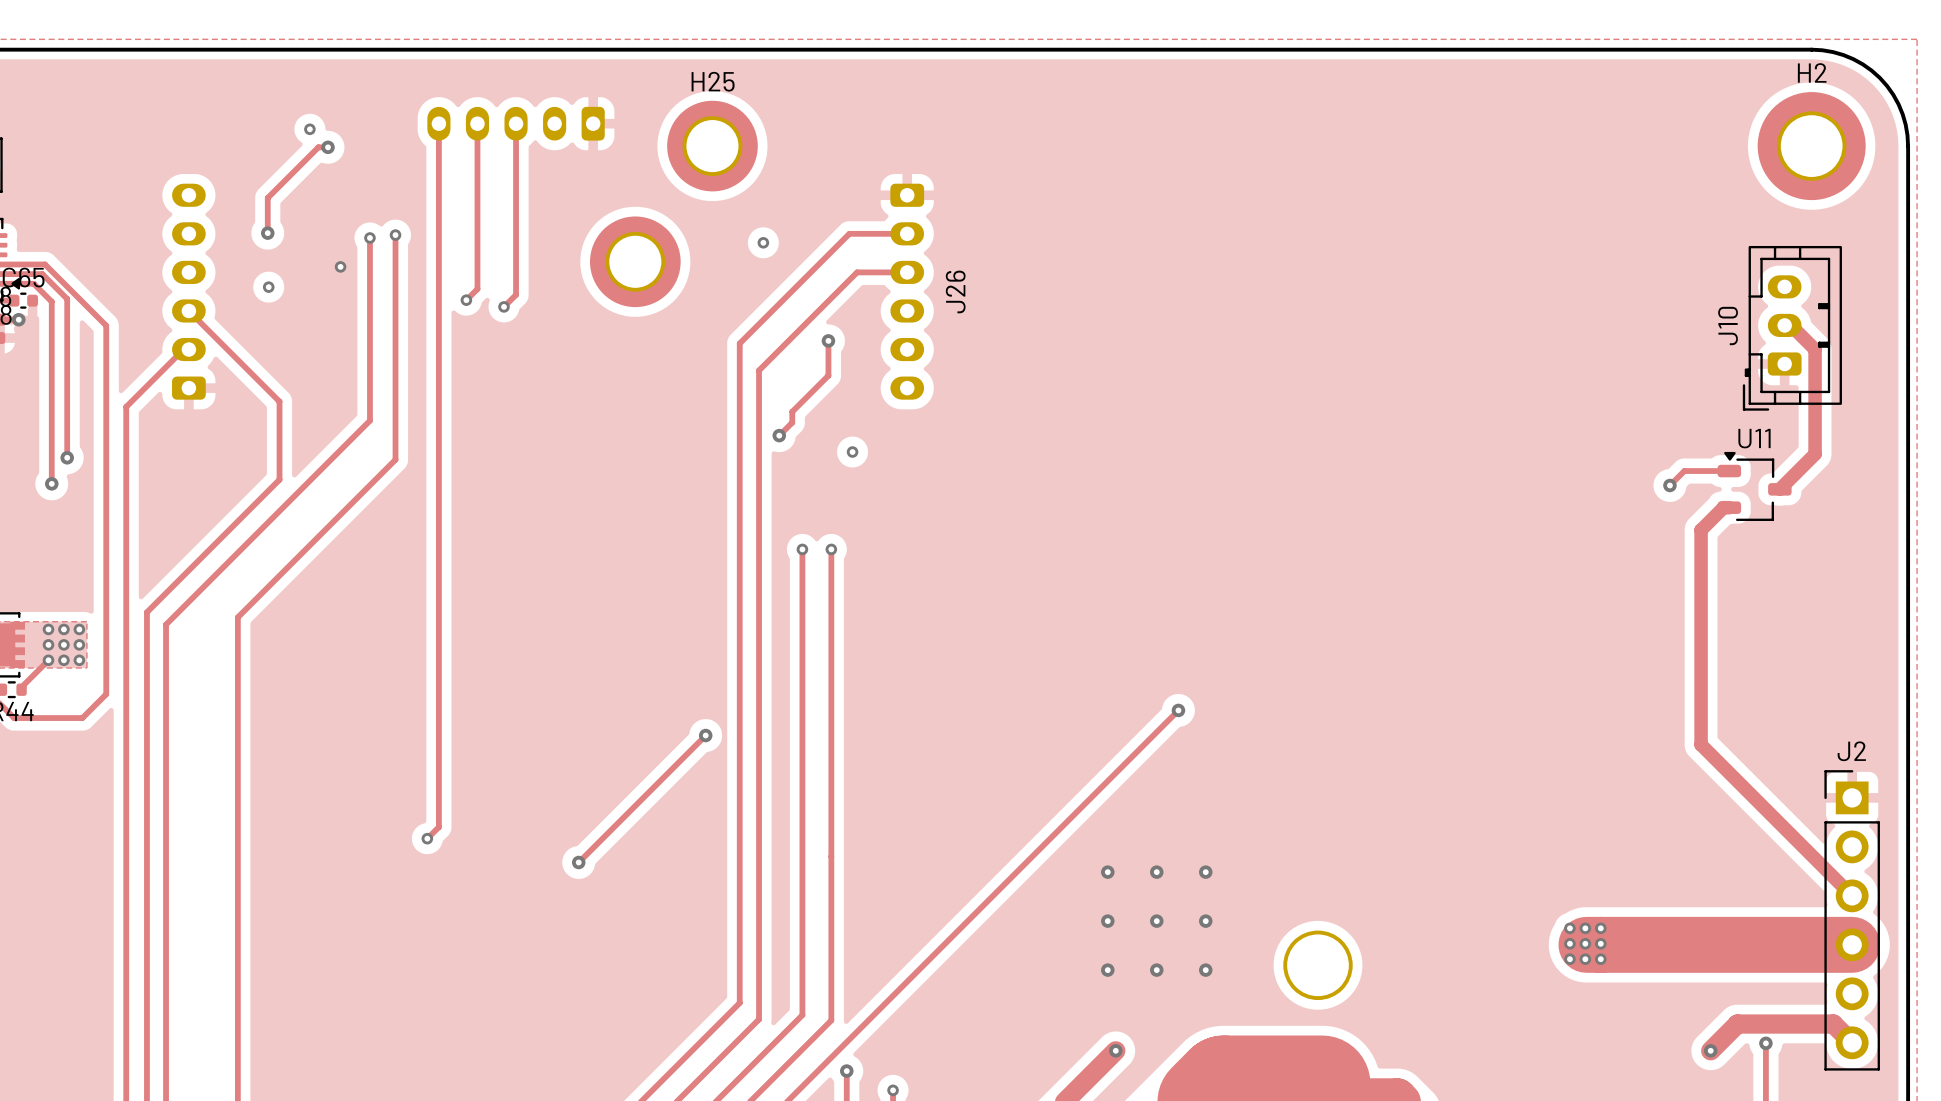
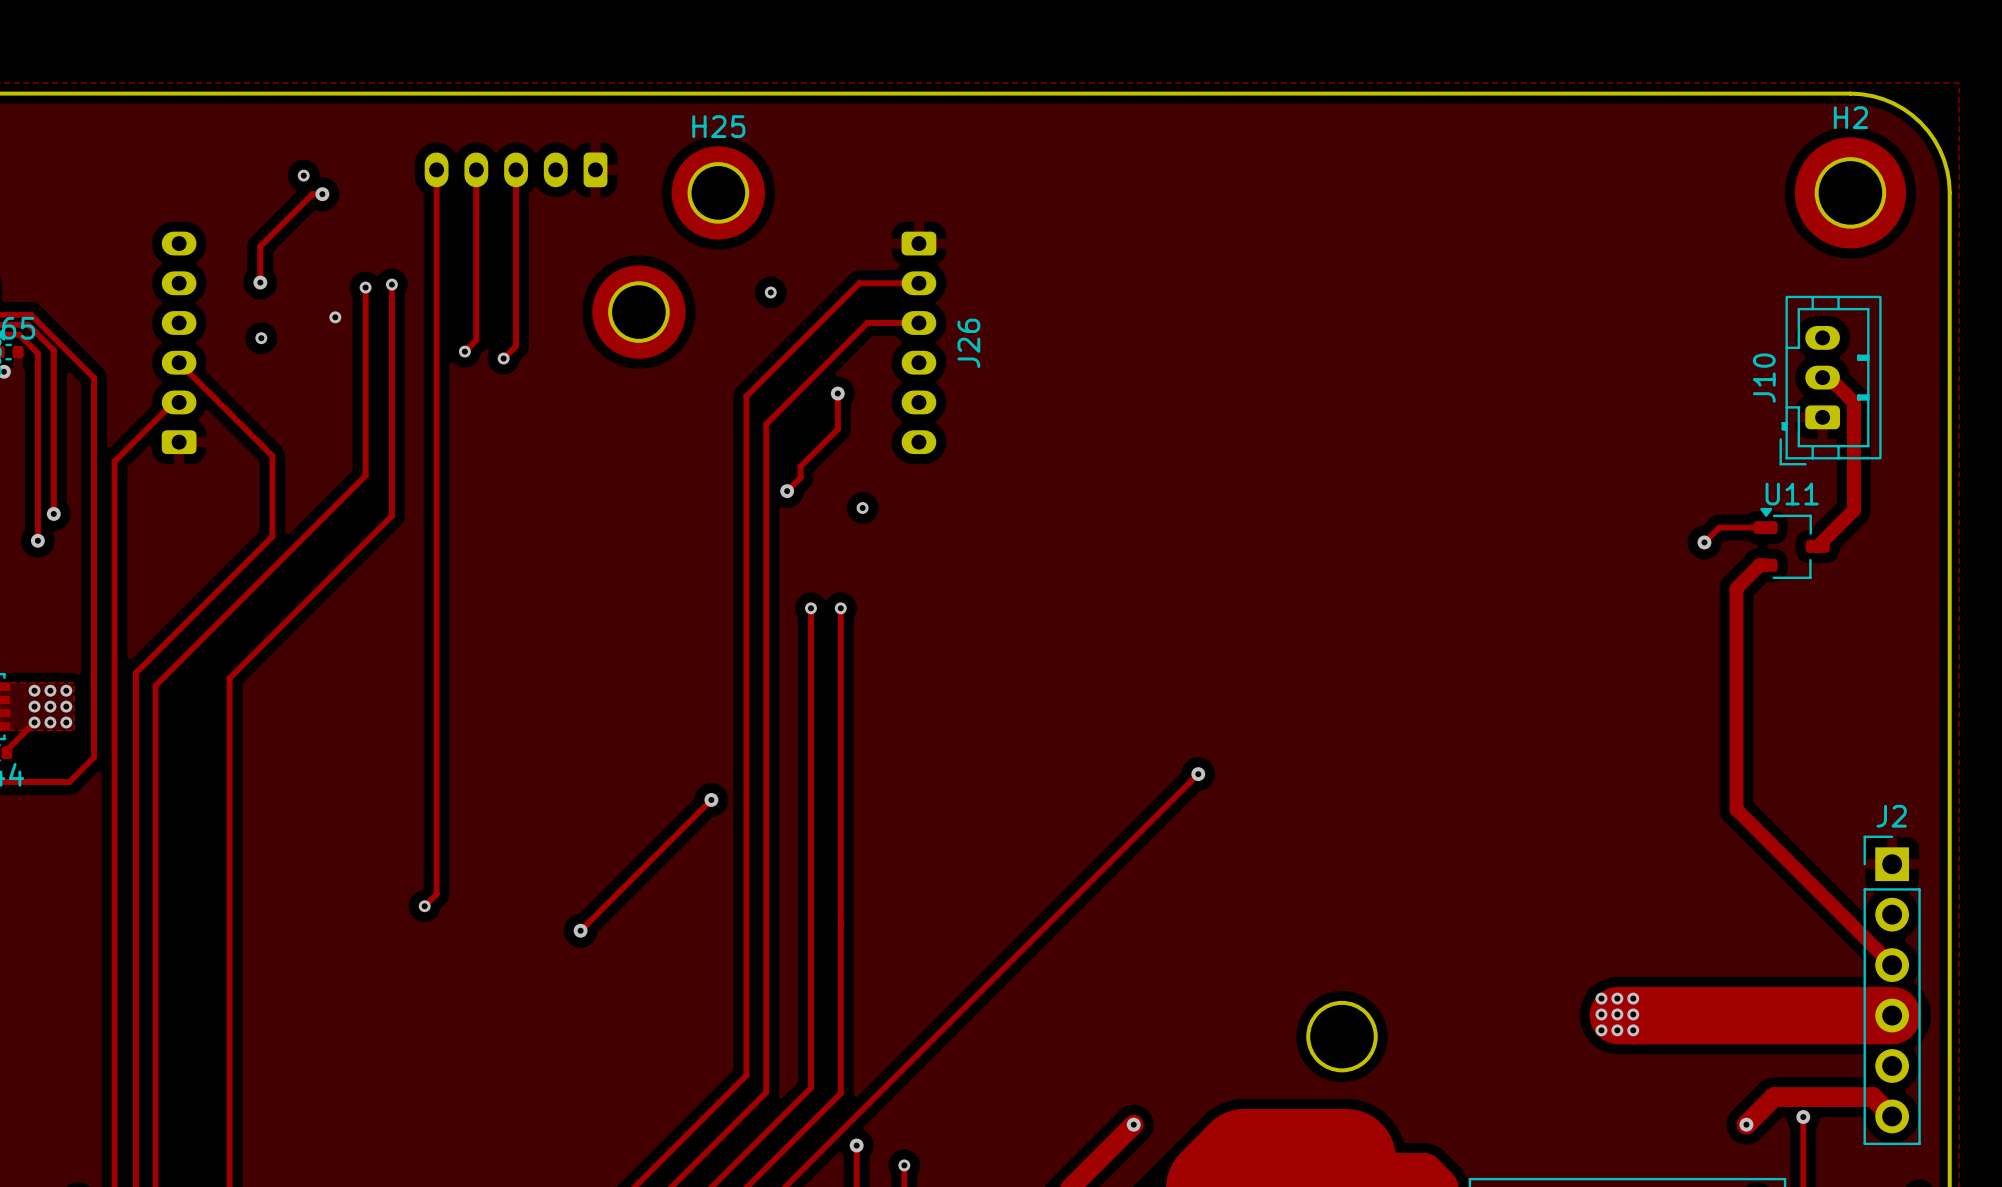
via: (1107, 872) -> none
via: (1156, 872) -> none
via: (1205, 872) -> none
via: (1107, 921) -> none
via: (1156, 921) -> none
via: (1205, 921) -> none
via: (1107, 970) -> none
via: (1156, 970) -> none
via: (1205, 970) -> none

